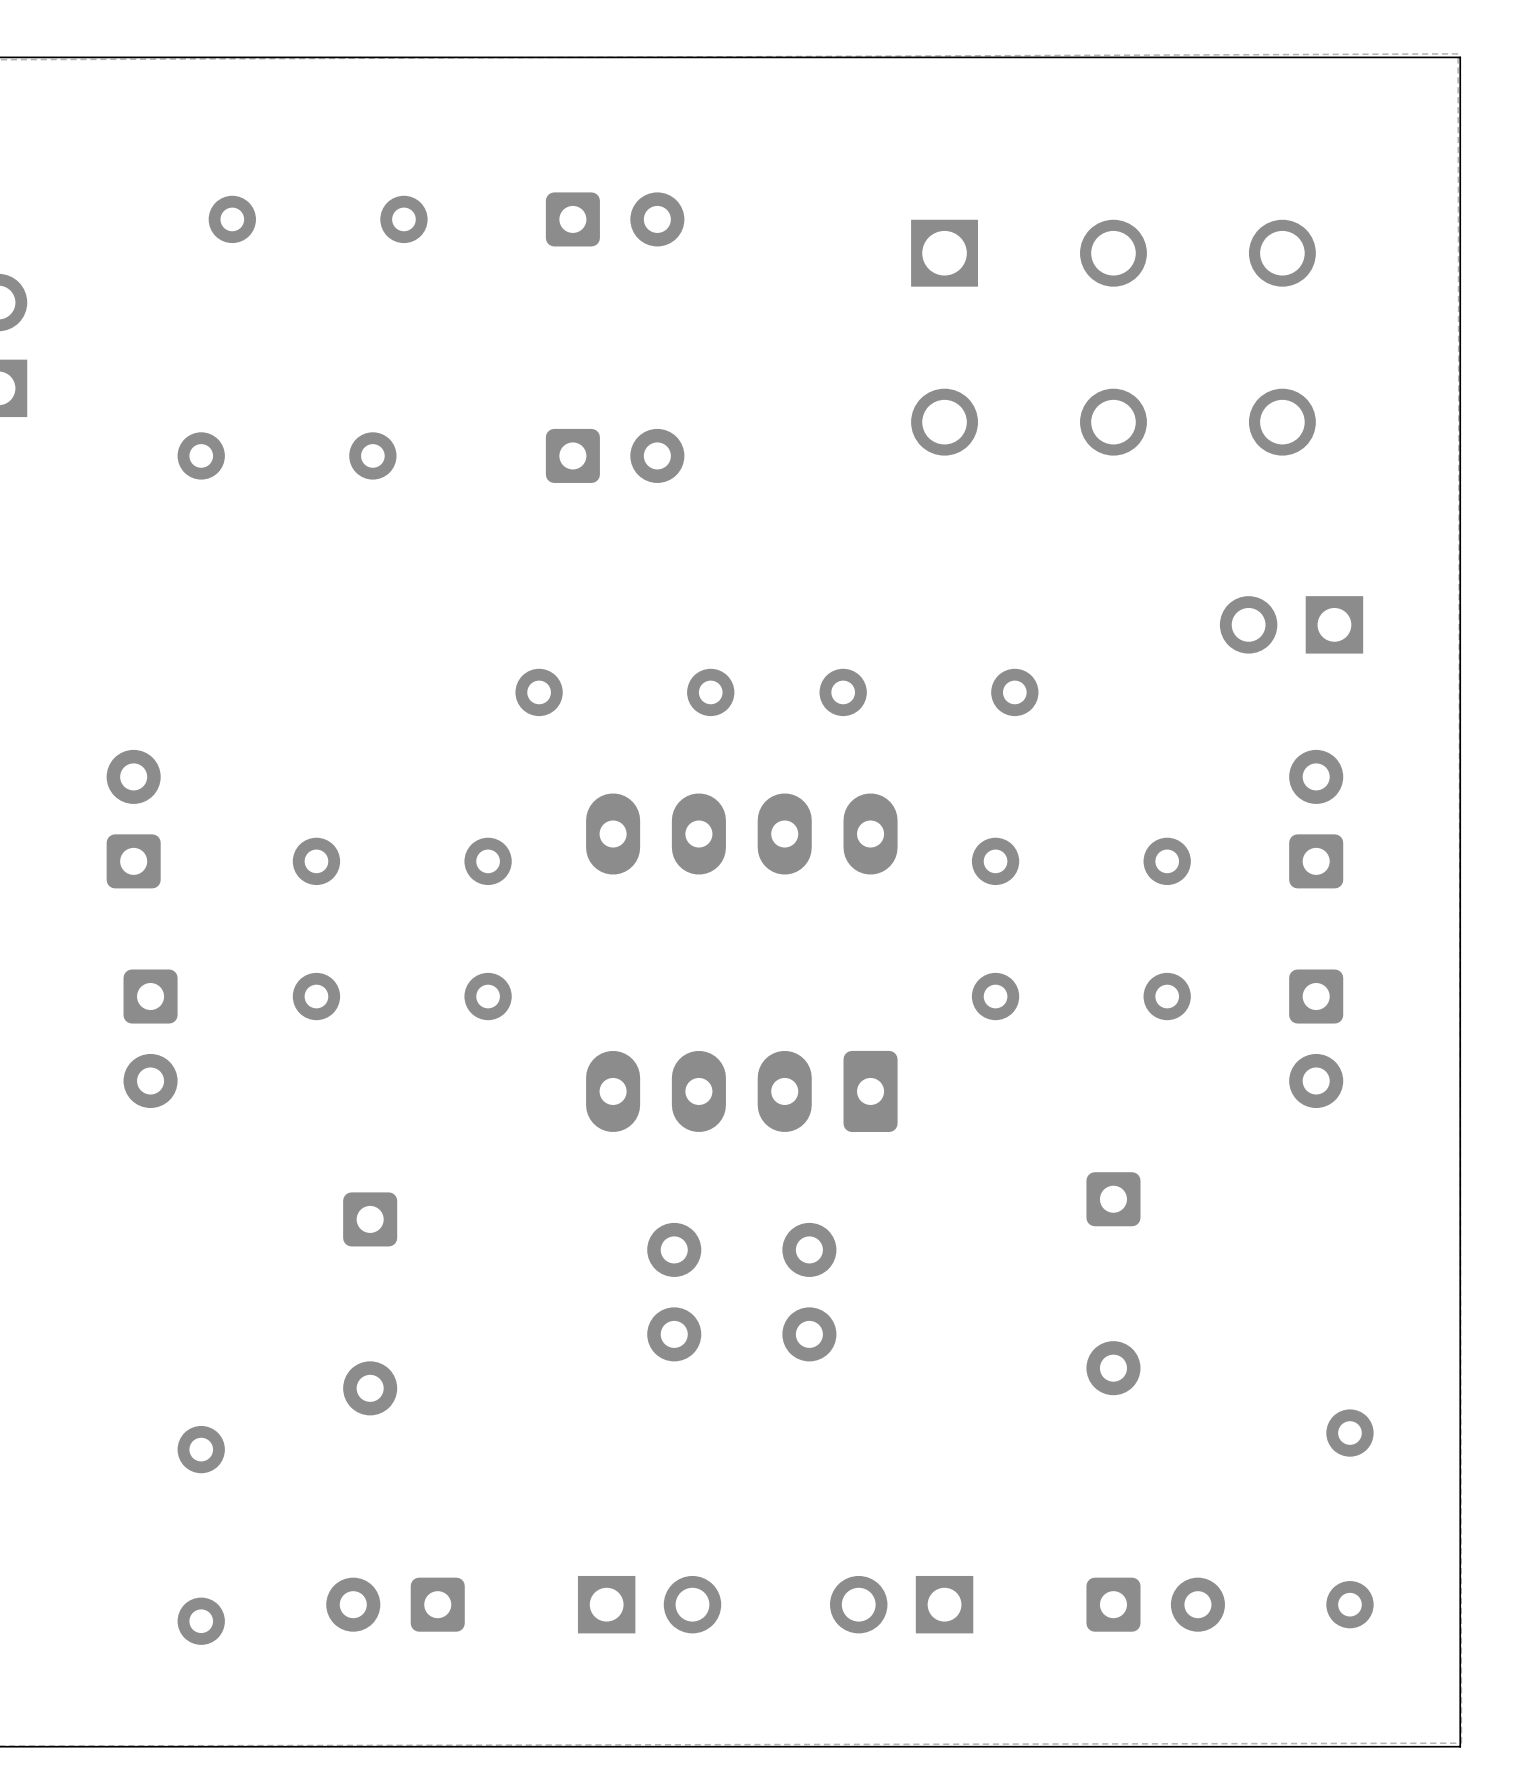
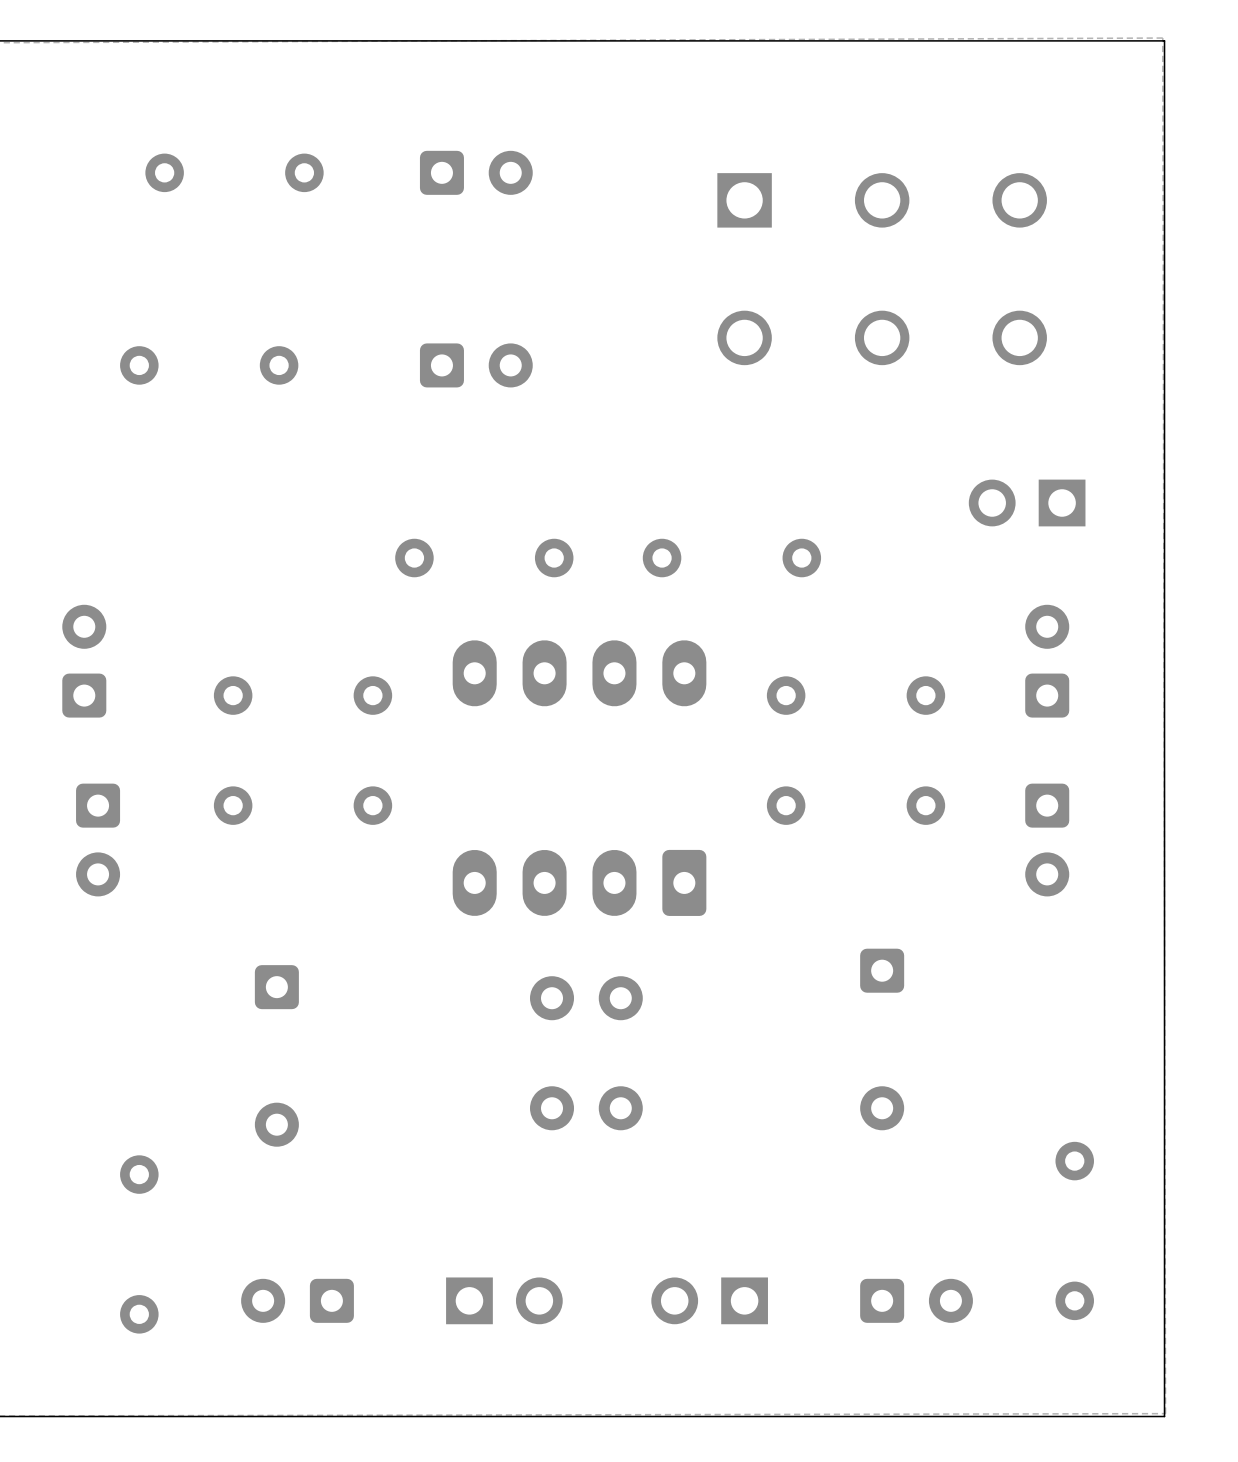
part: none -> (586, 998)
part: (674, 1292) -> none
part: (809, 1292) -> none
part: none -> (586, 1108)

